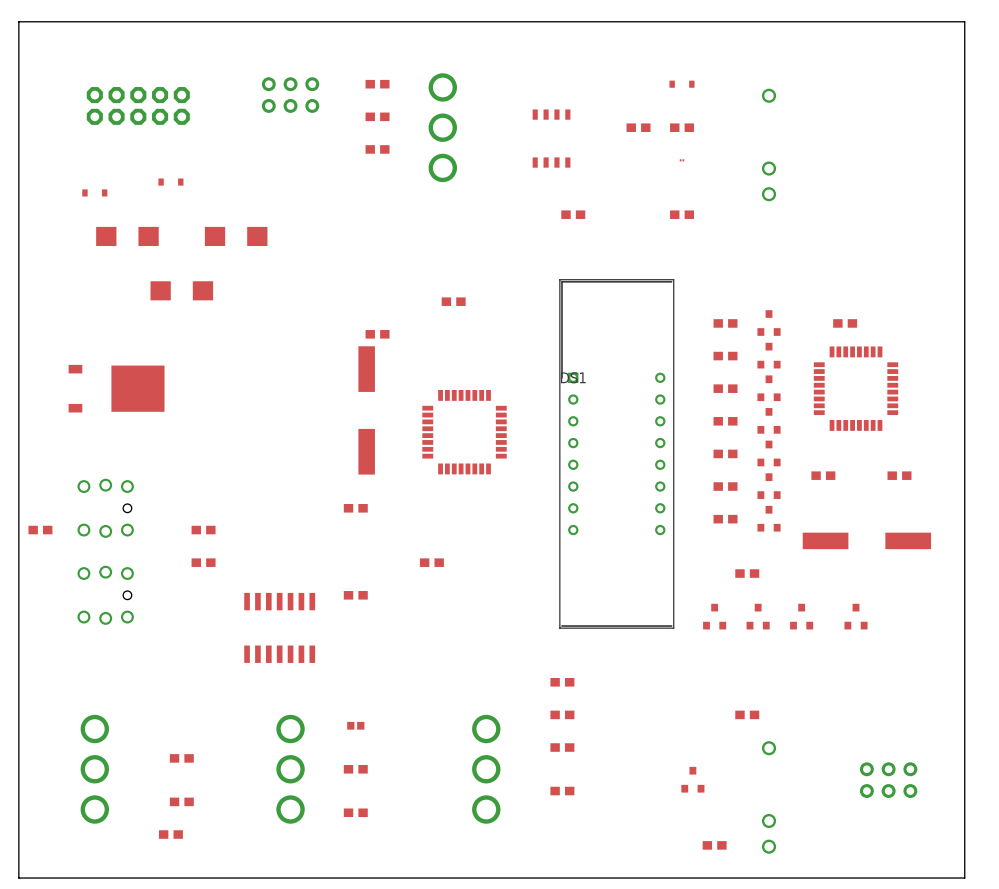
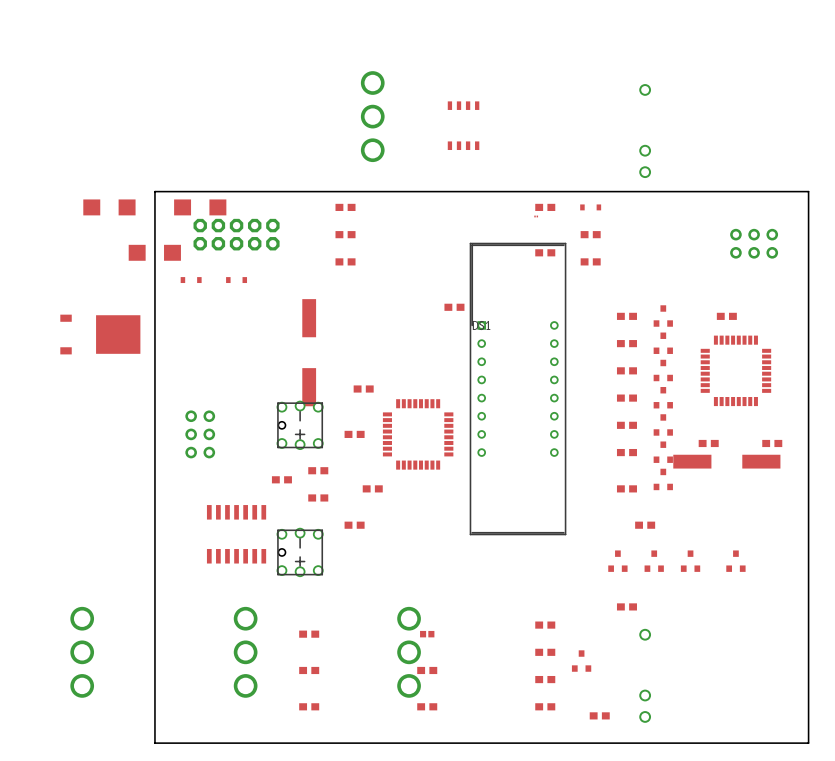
part: (377, 84) -> none
part position: (682, 84) -> (590, 207)
part: (290, 95) -> none
part: (138, 105) -> none
part: (377, 116) -> none
part: (638, 127) -> none
part: (682, 127) -> none
part: (377, 149) -> none
part position: (682, 160) -> (536, 216)
part: (170, 182) -> none
part: (94, 192) -> none
part: (573, 214) -> none
part: (682, 214) -> none
board edge: (964, 217) (964, 21) (18, 21) (18, 878) (181, 878) -> (808, 191) (154, 191) (154, 743)
part: none -> (345, 207)
part: none -> (545, 207)
part: none -> (236, 234)
part: none -> (345, 234)
part: none -> (590, 234)
part: none -> (754, 243)
part: none -> (545, 252)
part: none -> (345, 261)
part: (453, 301) -> none
part: none -> (590, 261)
part: none -> (191, 280)
part: none -> (236, 280)
part: (725, 323) -> none
part: (769, 323) -> none
part position: (845, 323) -> (726, 316)
part: (377, 334) -> none
part: (769, 355) -> none
part: none -> (454, 307)
part: (725, 356) -> none
part: none -> (626, 316)
part: none -> (663, 316)
part: (725, 388) -> none
part: (769, 388) -> none
part position: (856, 388) -> (735, 370)
part: none -> (626, 343)
part: none -> (663, 343)
part: (769, 420) -> none
part: (725, 421) -> none
part: none -> (663, 370)
part position: (464, 432) -> (418, 434)
part: none -> (626, 370)
part: none -> (363, 389)
part: (725, 453) -> none
part: (769, 453) -> none
part: none -> (626, 398)
part: none -> (663, 397)
part: (823, 475) -> none
part: (899, 475) -> none
part: (725, 486) -> none
part: (769, 486) -> none
part: none -> (663, 424)
part: none -> (300, 425)
part: none -> (626, 425)
part: (105, 508) -> none
part: none -> (200, 434)
part: (355, 508) -> none
part: none -> (354, 434)
part: (769, 518) -> none
part: (725, 519) -> none
part: none -> (708, 443)
part: none -> (772, 443)
part: none -> (663, 452)
part: (40, 530) -> none
part: (203, 530) -> none
part: none -> (626, 452)
part: none -> (318, 470)
part: (203, 562) -> none
part: none -> (281, 479)
part position: (431, 562) -> (372, 488)
part: none -> (663, 479)
part: none -> (318, 497)
part: (105, 595) -> none
part: (355, 595) -> none
part: (714, 616) -> none
part: (758, 616) -> none
part: (801, 616) -> none
part: (856, 616) -> none
part: none -> (354, 525)
part: none -> (645, 525)
part: none -> (300, 552)
part: none -> (617, 561)
part: none -> (654, 561)
part: none -> (690, 561)
part: none -> (735, 561)
part: (562, 682) -> none
part: (562, 714) -> none
part position: (355, 725) -> (427, 634)
part: none -> (545, 625)
part: none -> (309, 634)
part: (562, 747) -> none
part: (181, 758) -> none
part: (355, 769) -> none
part: none -> (545, 652)
part: (888, 780) -> none
part: none -> (309, 670)
part: none -> (427, 670)
part: (562, 791) -> none
part: (181, 801) -> none
part: none -> (545, 679)
part: (355, 812) -> none
part: (170, 834) -> none
part: none -> (309, 706)
part: none -> (427, 706)
part: none -> (545, 706)

